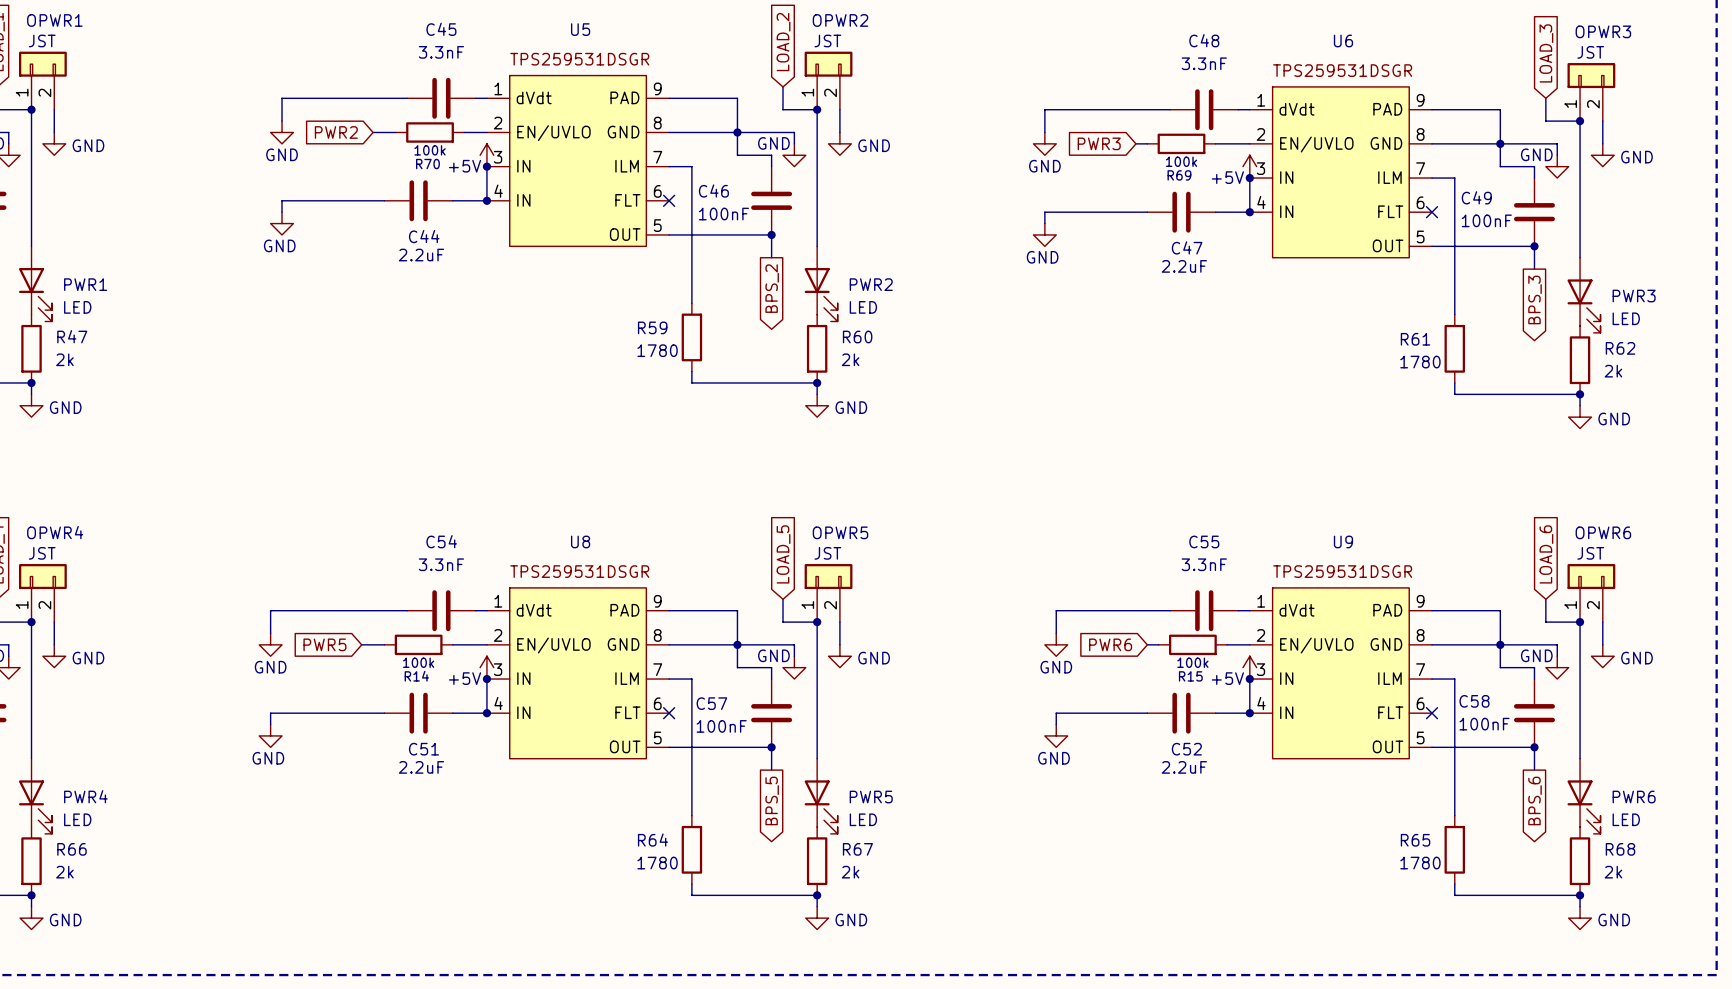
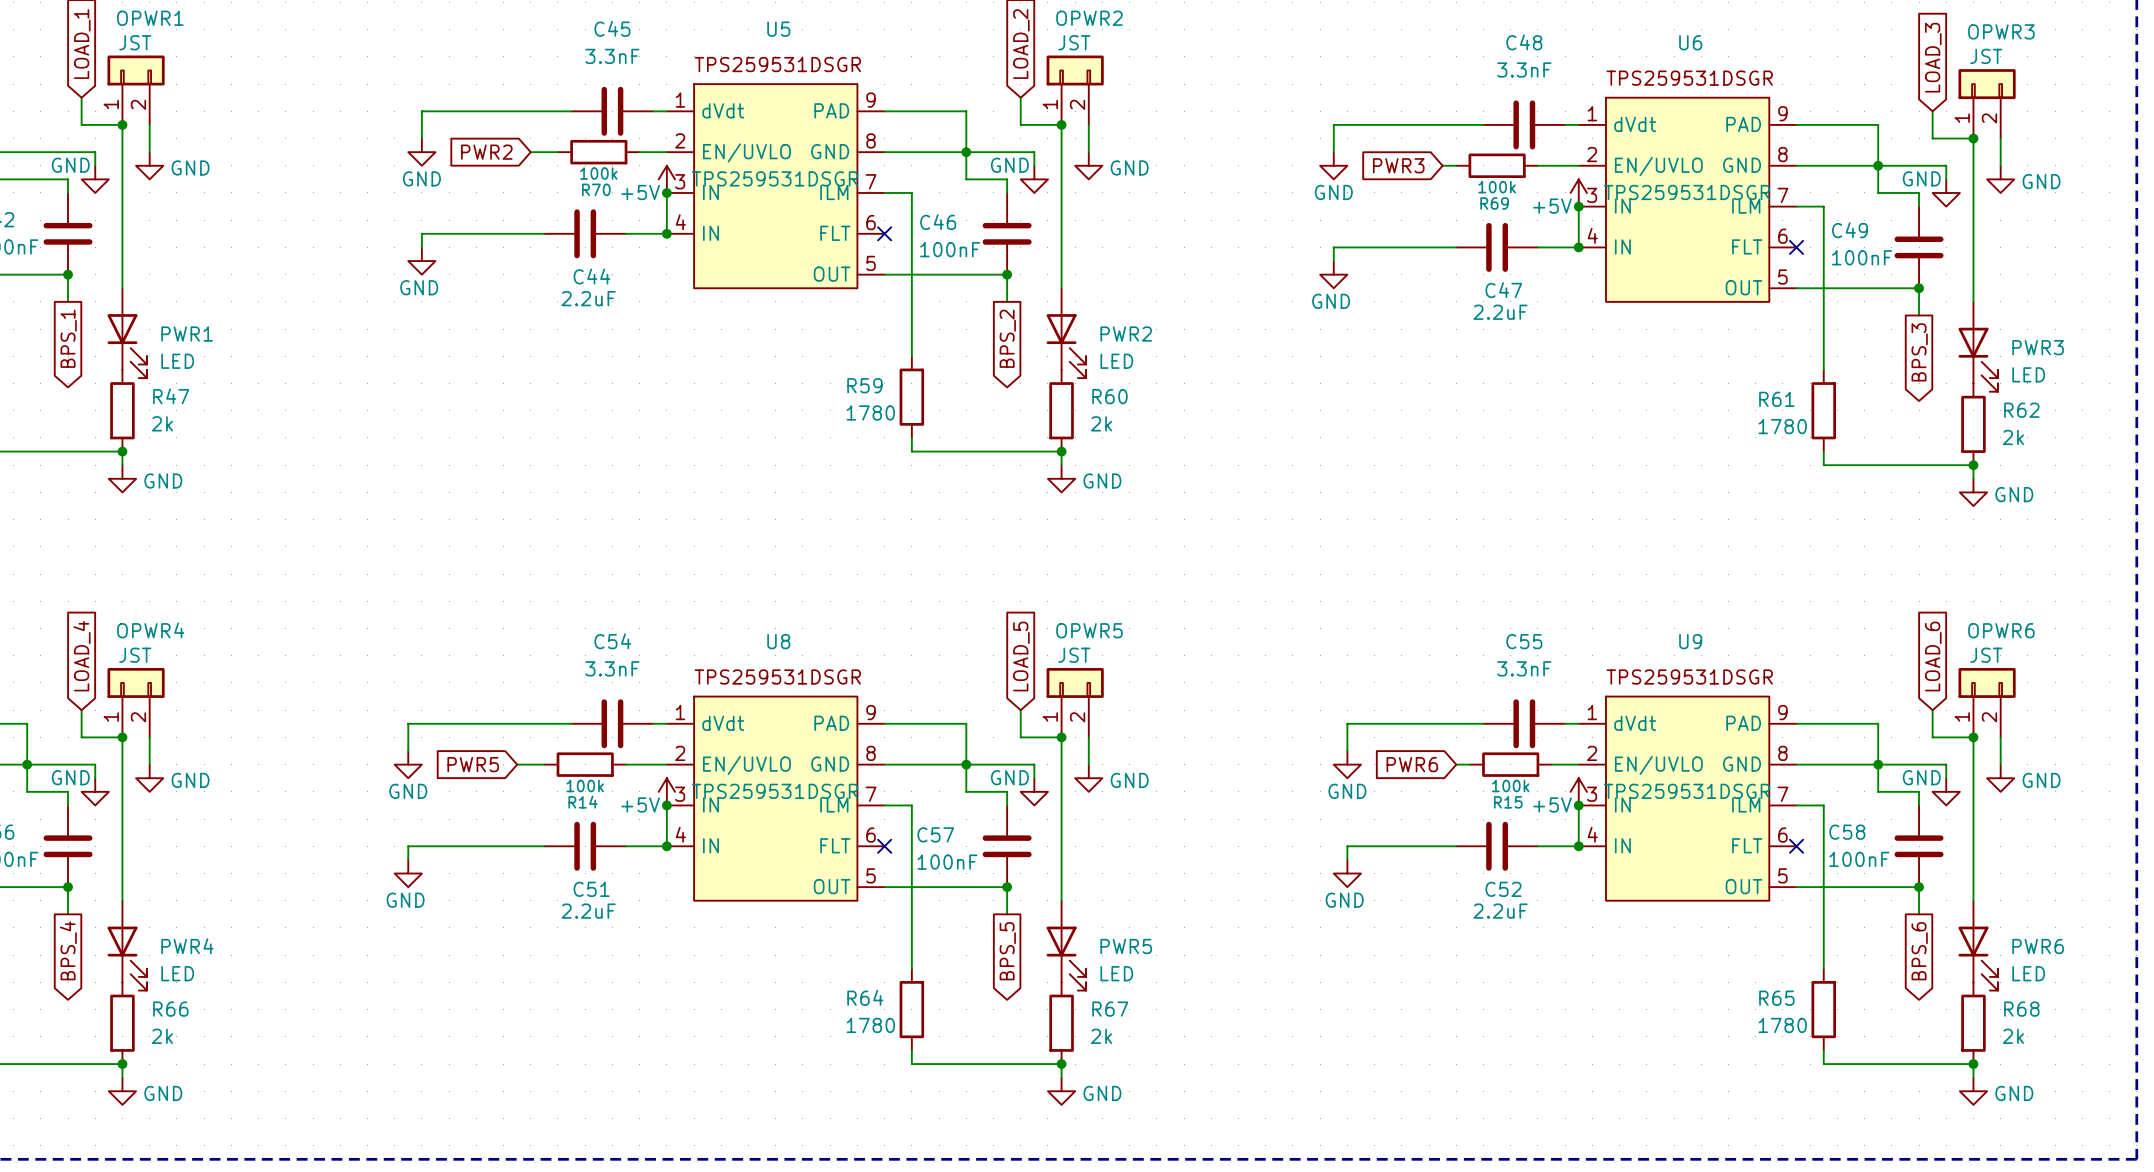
U5 value: none -> TPS259531DSGR (775, 178)
U6 value: none -> TPS259531DSGR (1687, 192)
U8 value: none -> TPS259531DSGR (775, 791)
U9 value: none -> TPS259531DSGR (1687, 791)

